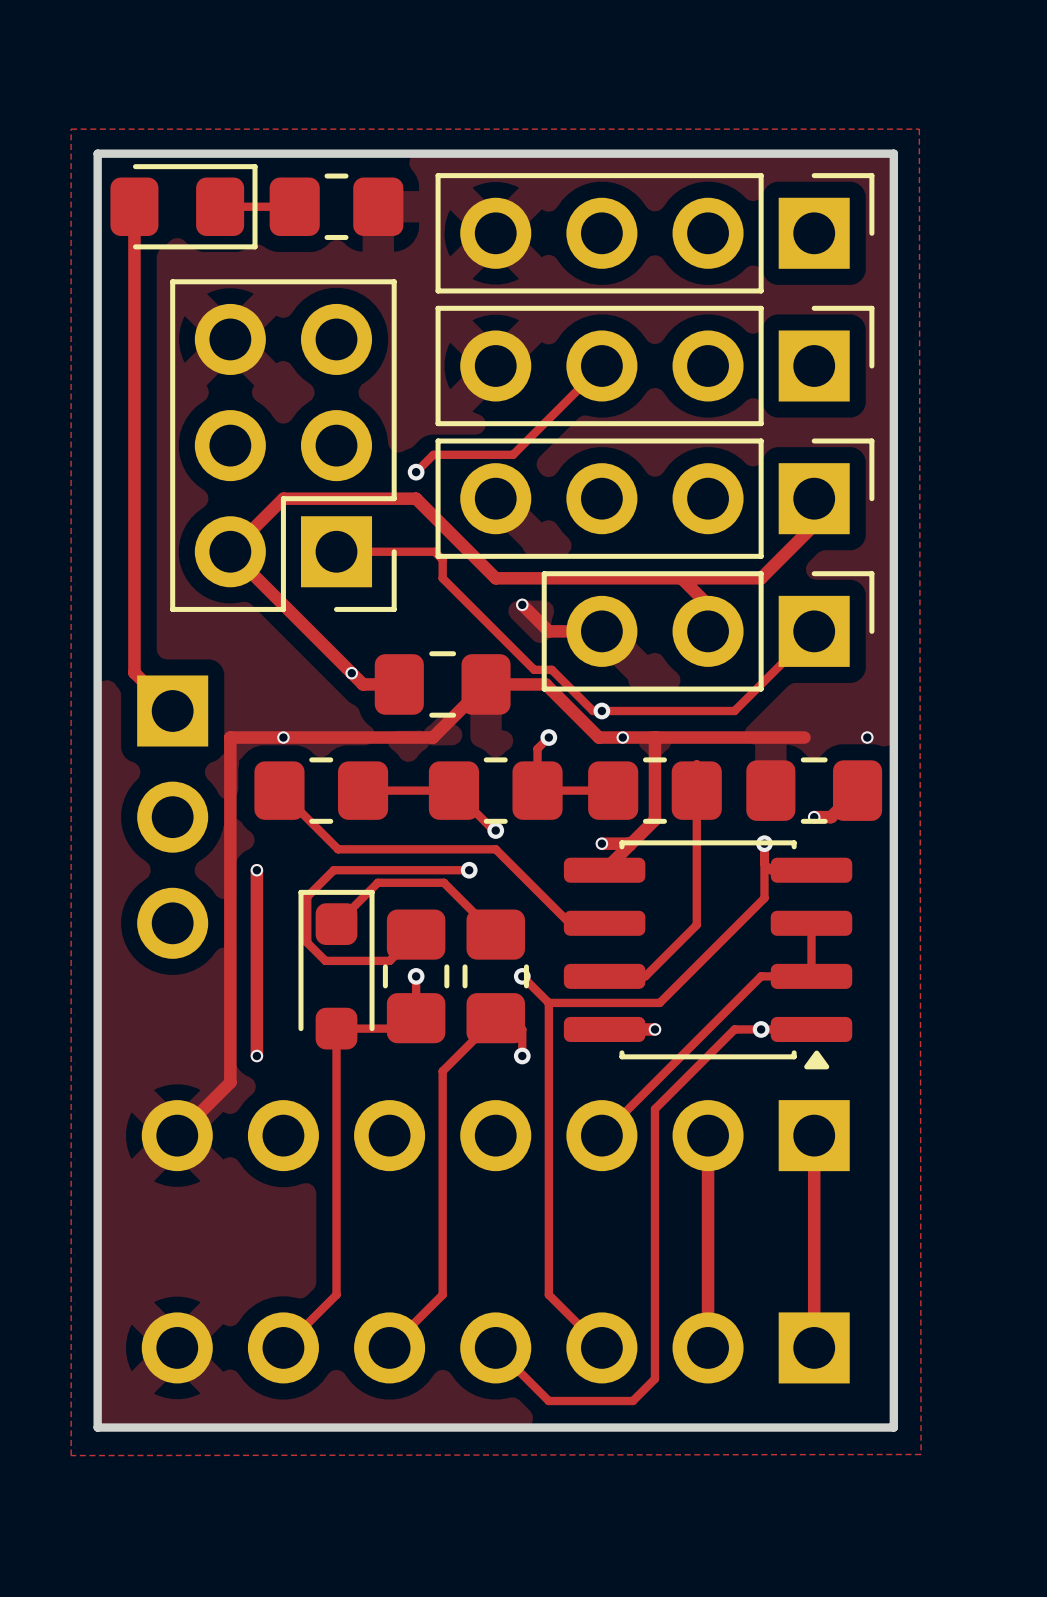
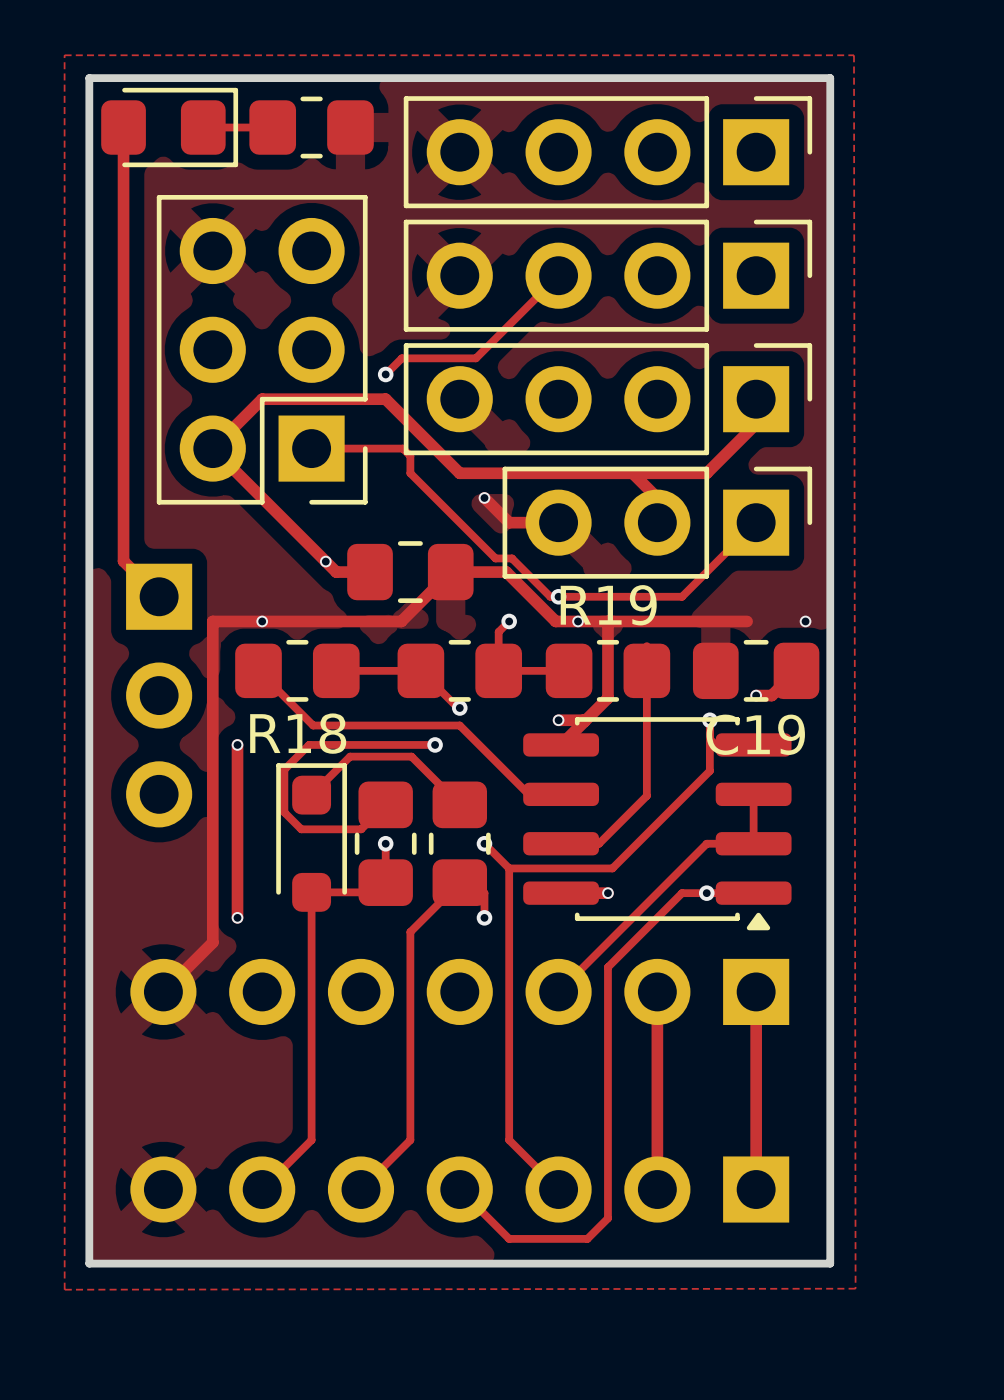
R19 name: none -> R19 (608, 605)
R18 name: none -> R18 (298, 733)
C19 name: none -> C19 (755, 734)

